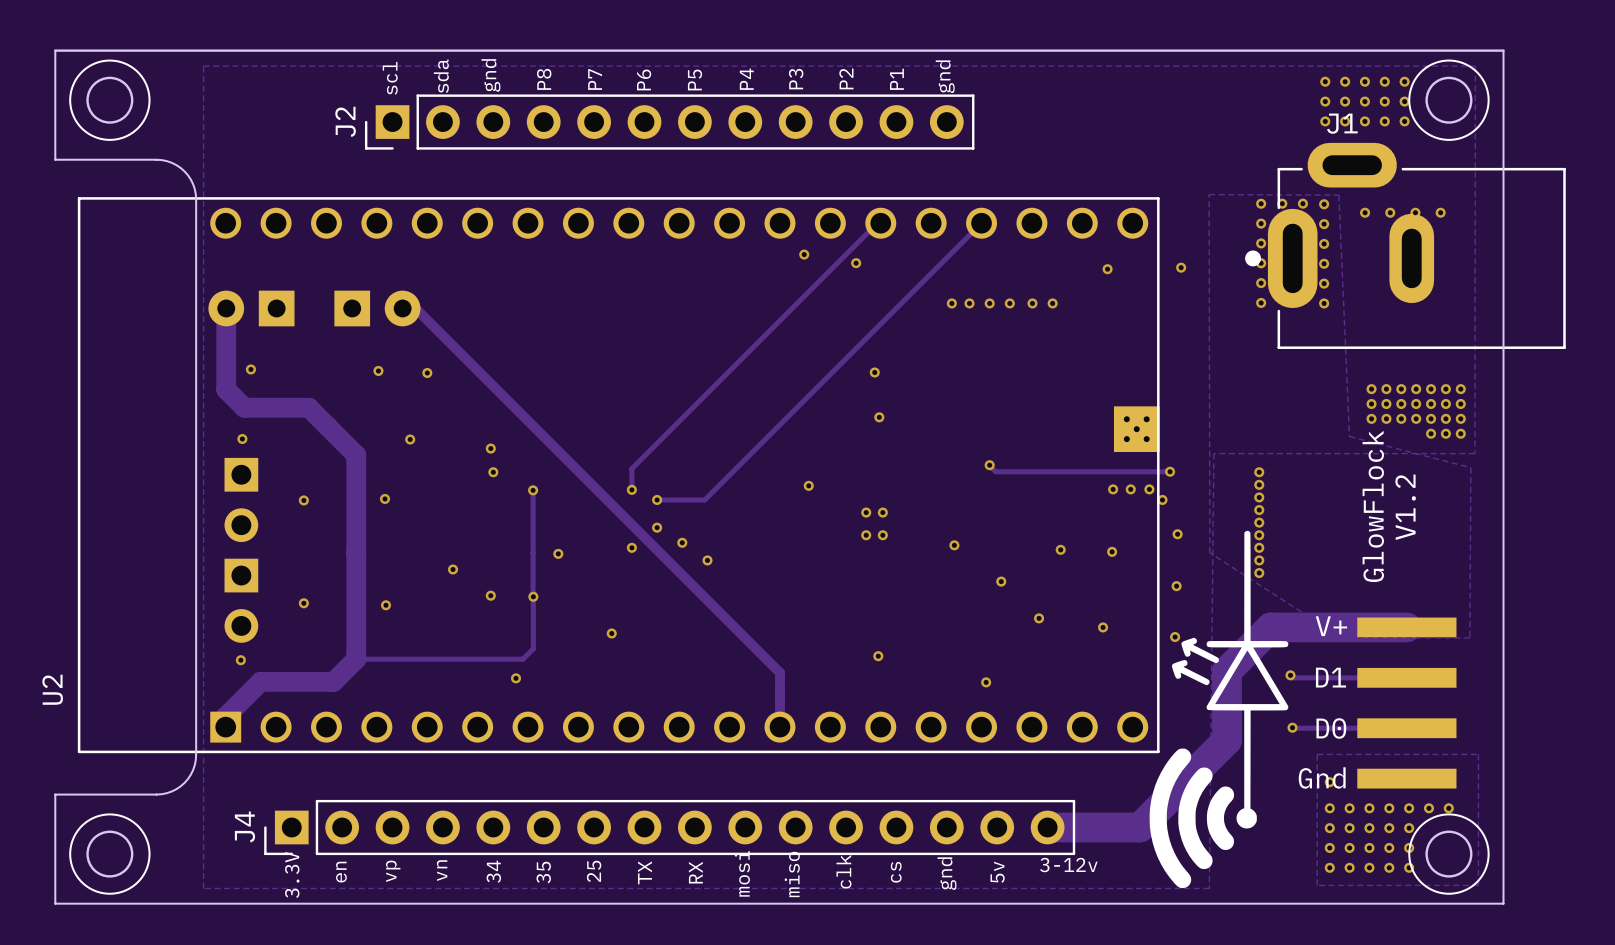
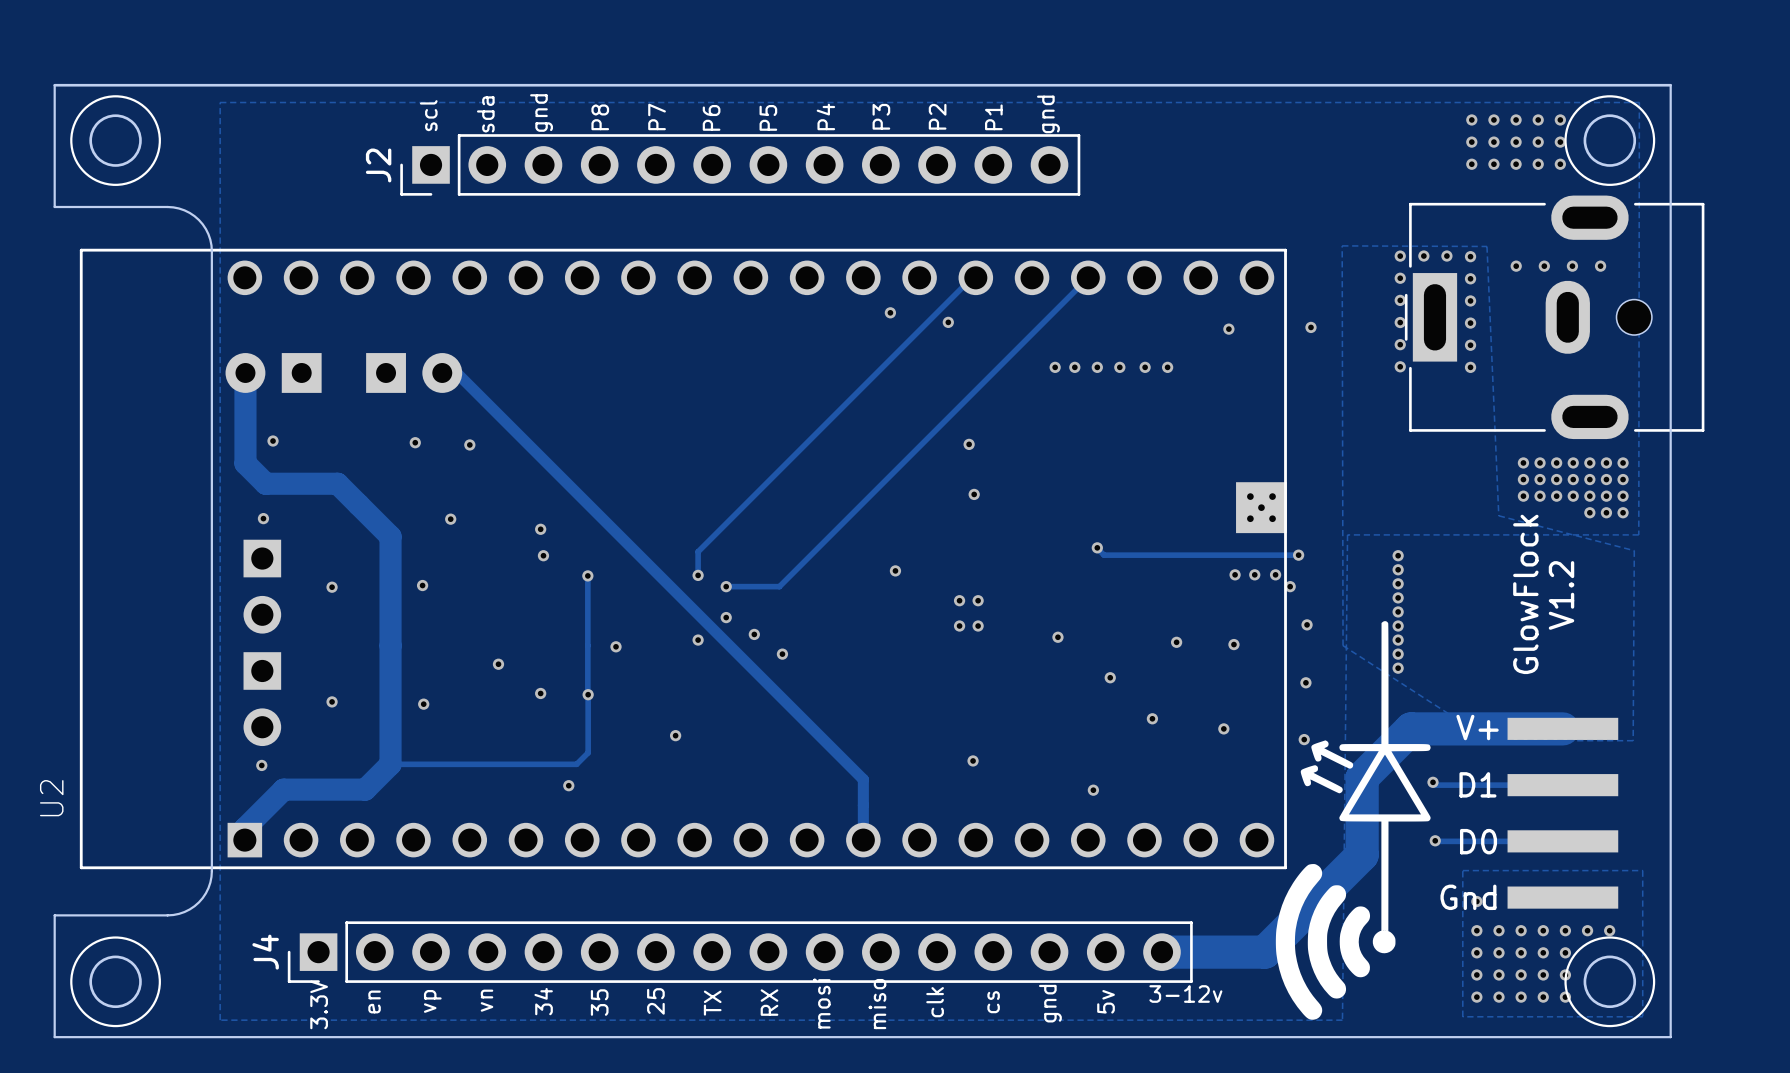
J1: (1405, 245) -> none
part: none -> (1554, 317)

